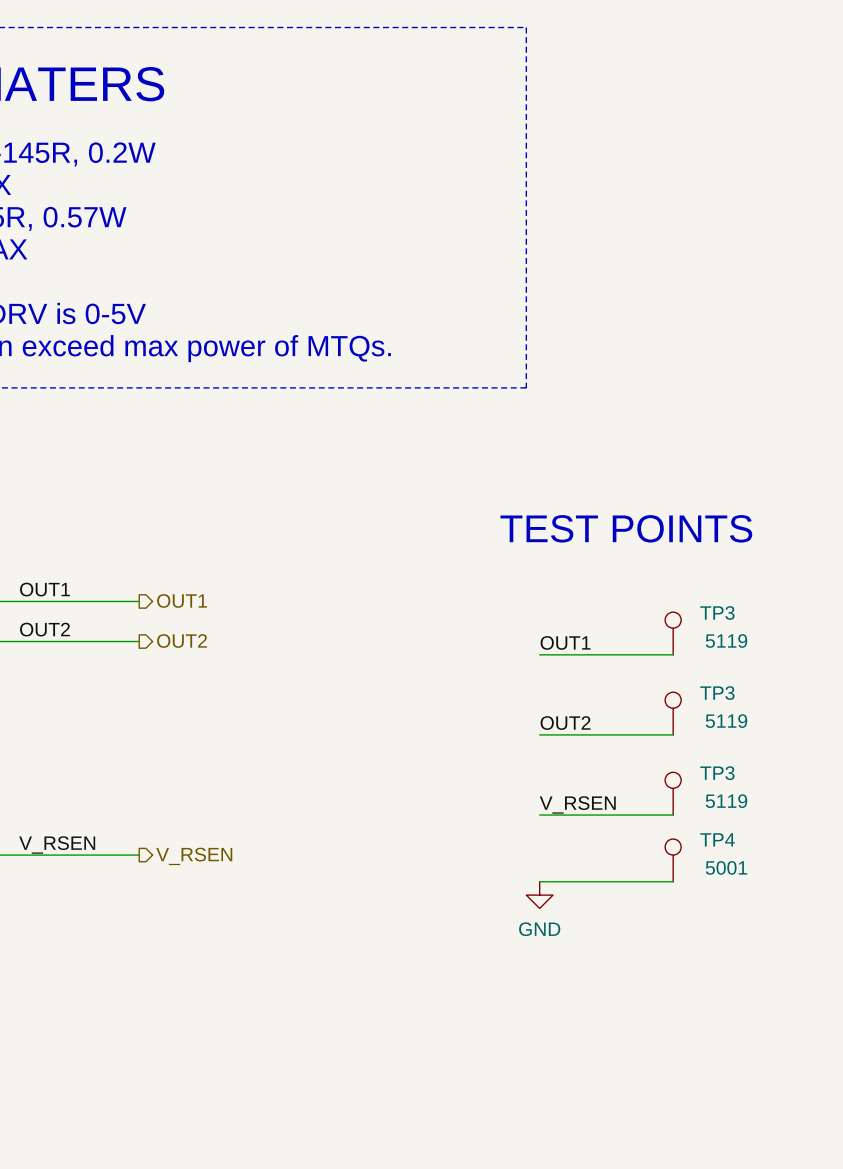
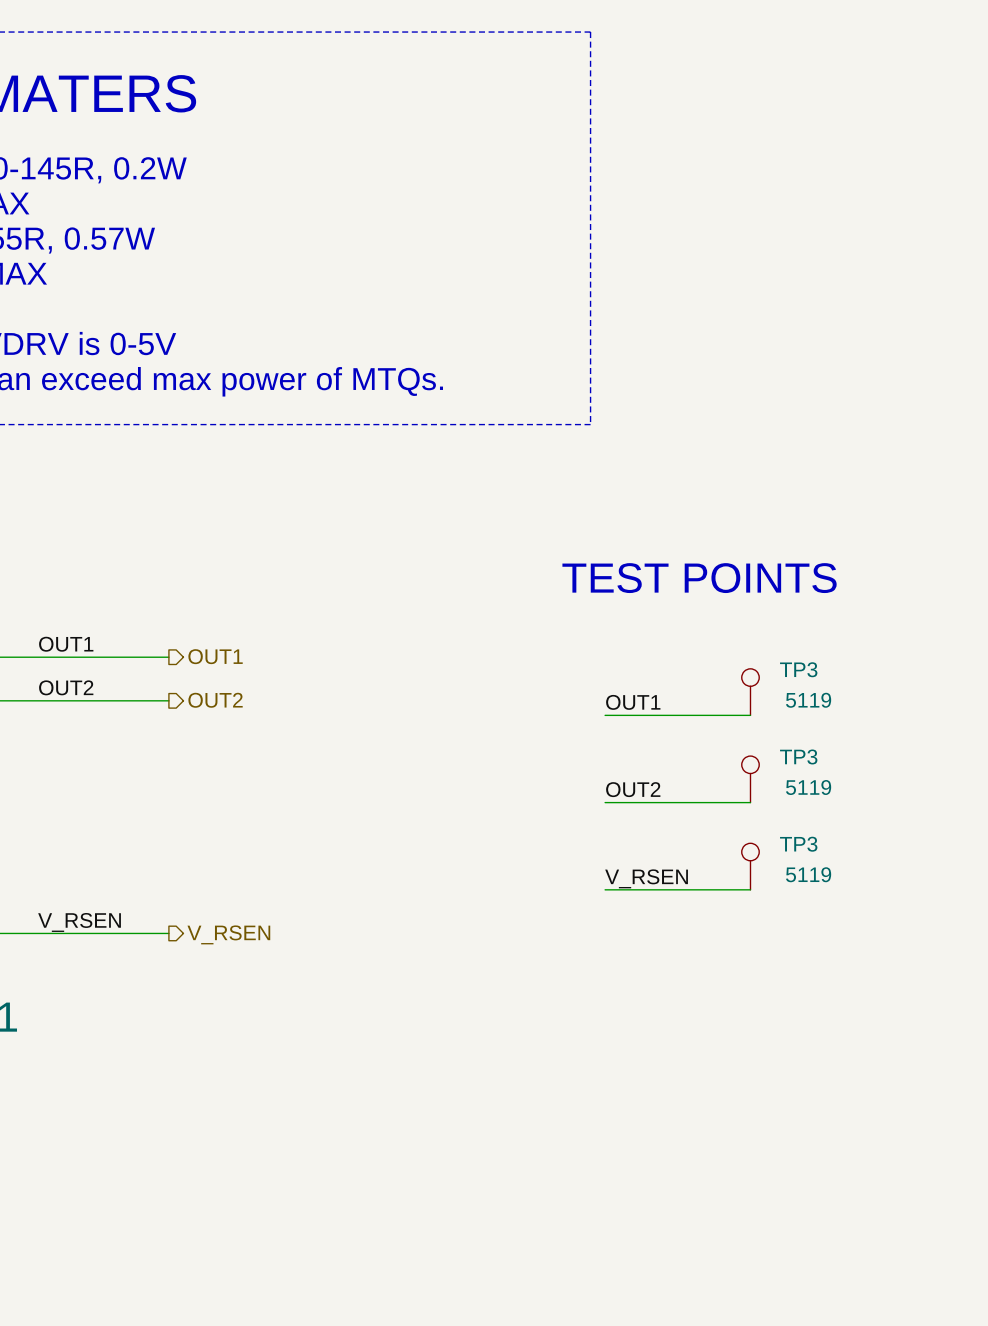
TP4: (673, 860) -> none
wire: (539, 881) (673, 881) -> none
power symbol: GND (539, 895) -> none

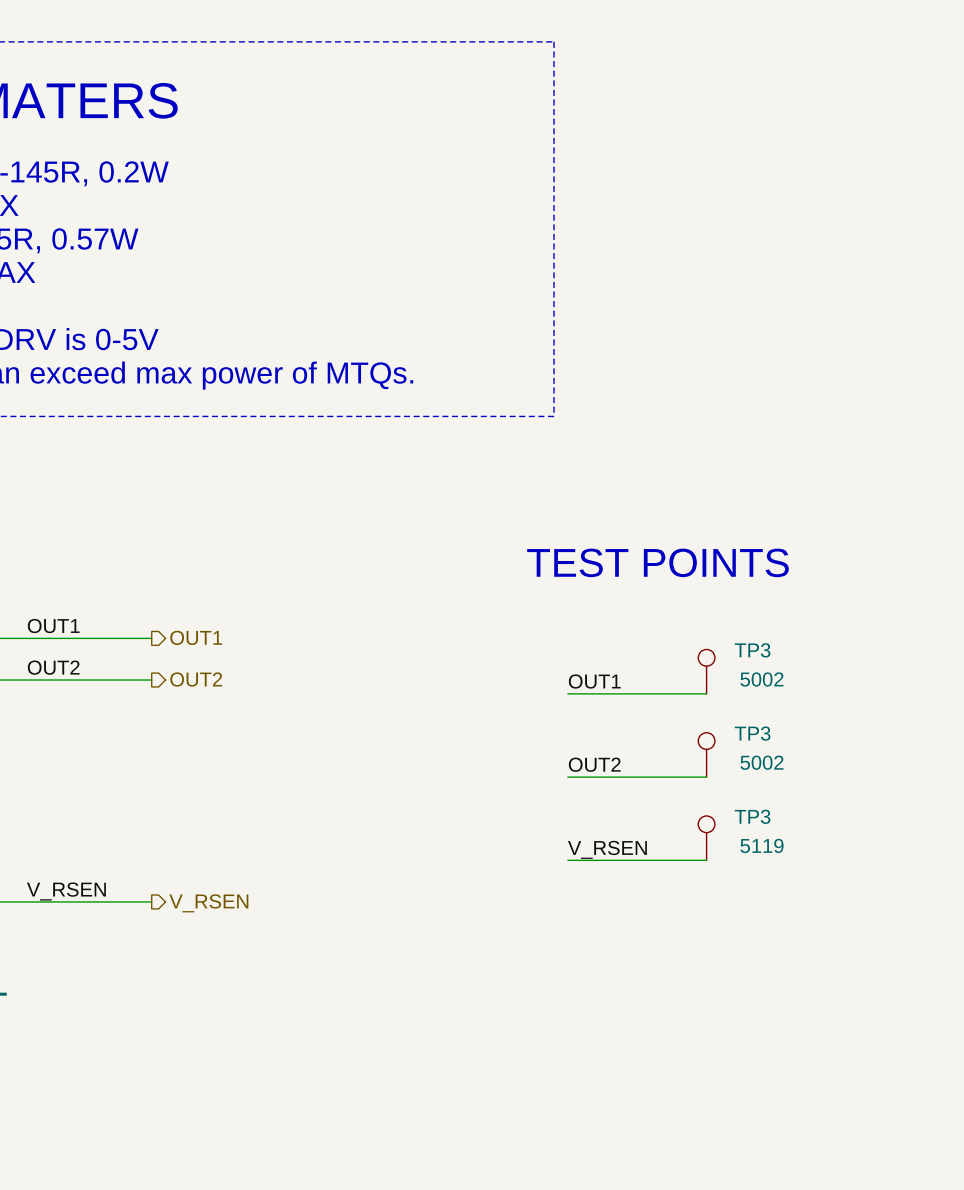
TP3 text: 5119 (808, 700) -> 5002 (761, 679)
TP3 text: 5119 (808, 787) -> 5002 (761, 762)

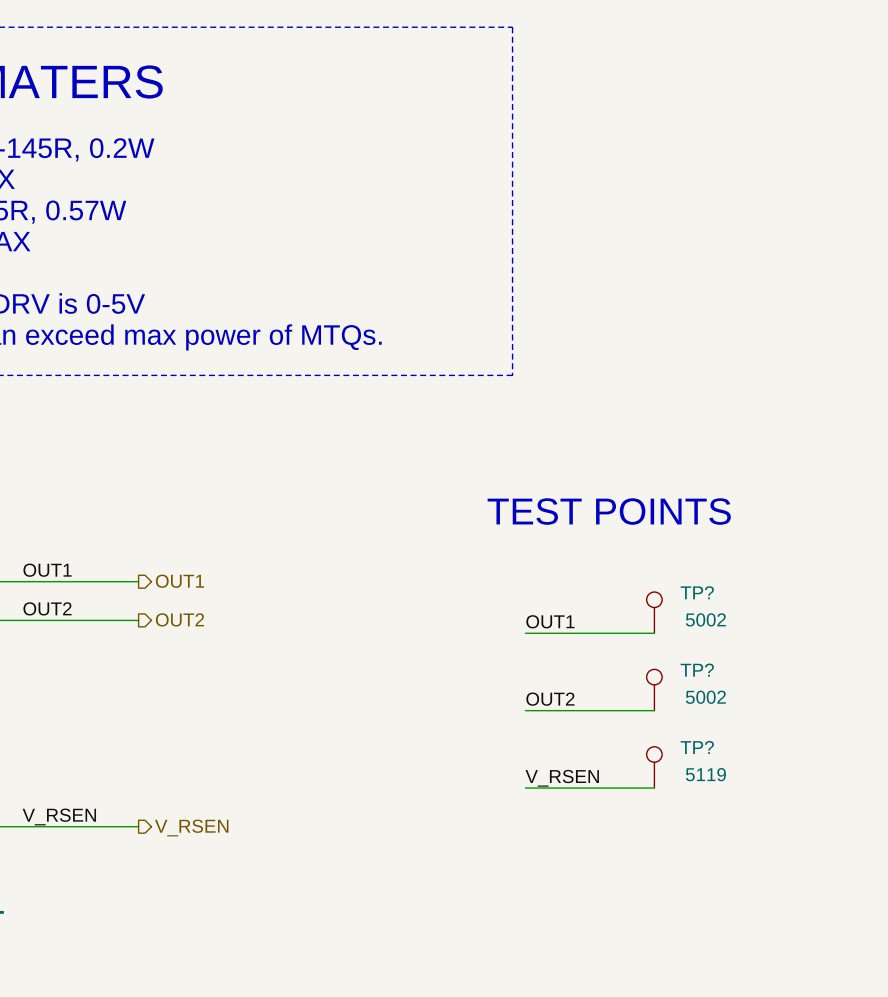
TP3 name: TP3 (752, 650) -> TP? (697, 592)
TP3 name: TP3 (752, 733) -> TP? (697, 670)
TP3 name: TP3 (752, 816) -> TP? (697, 747)

